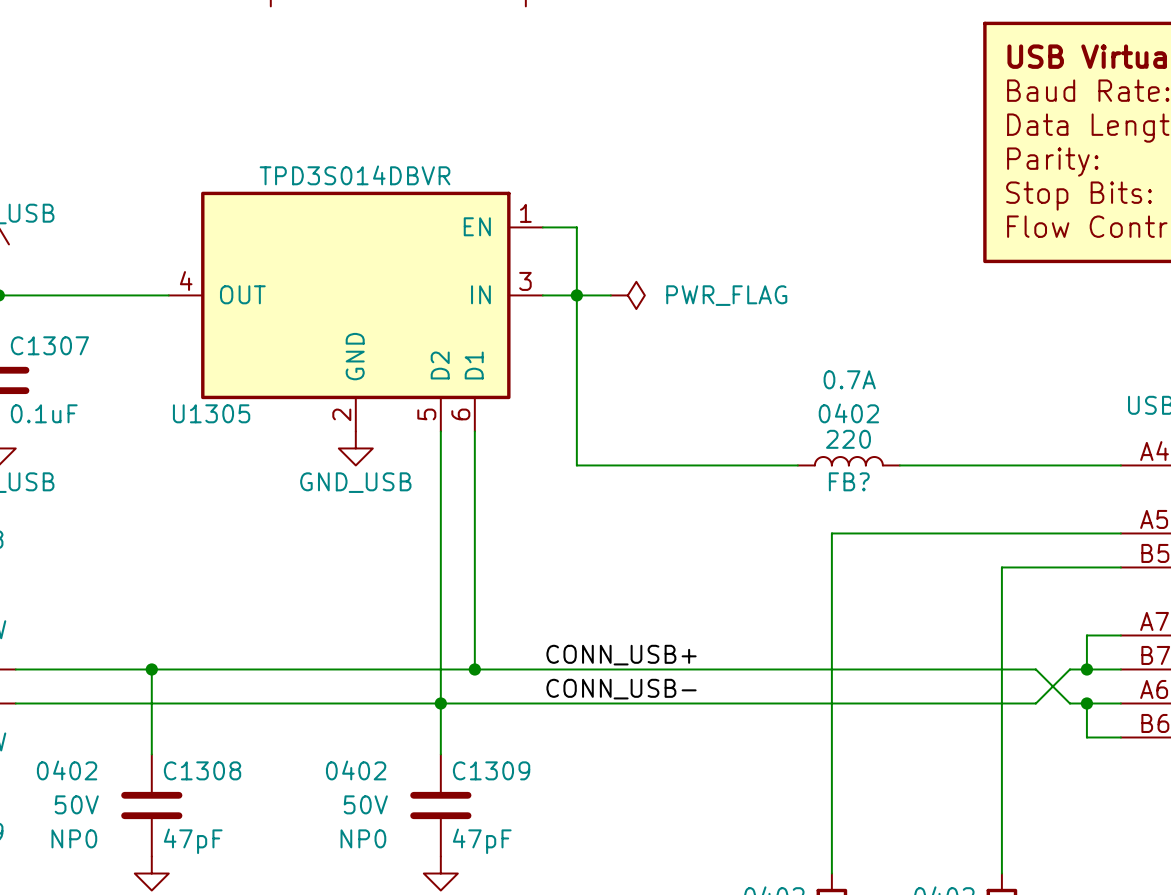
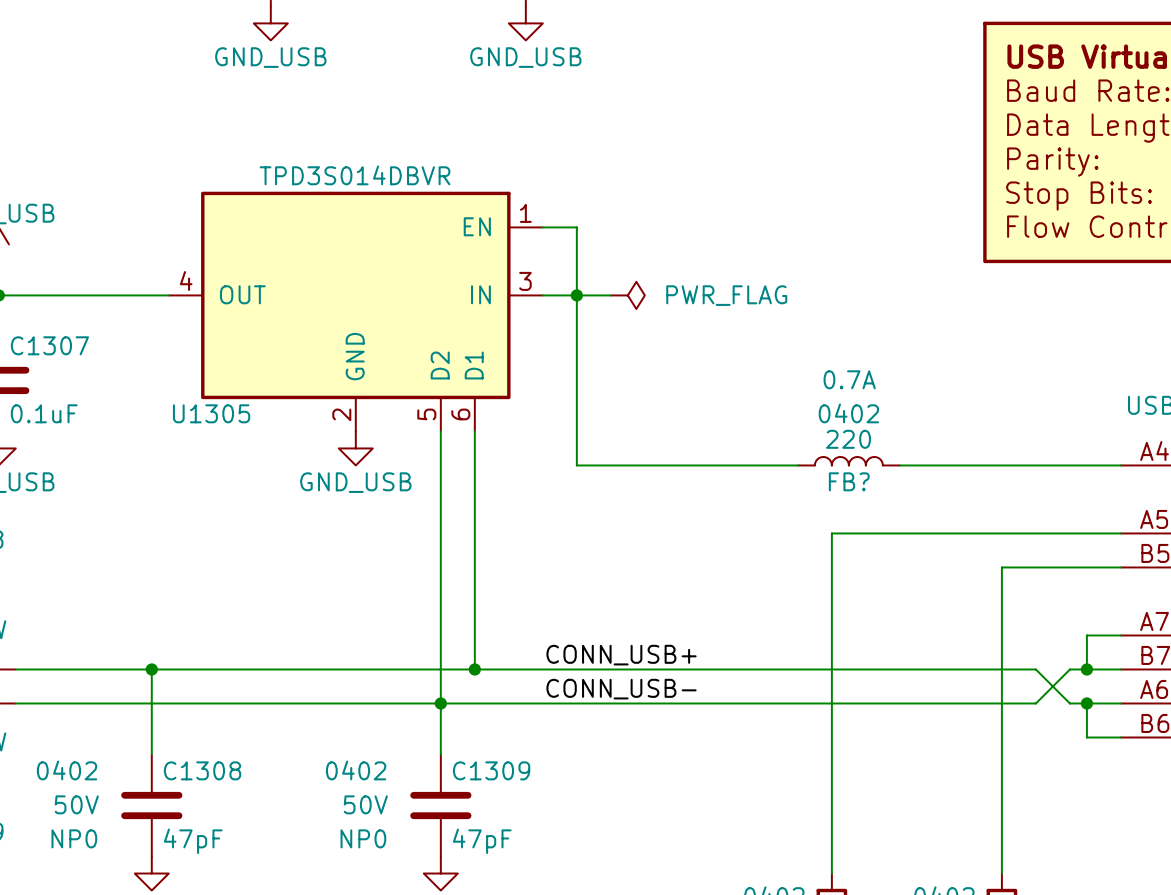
power symbol: none -> GND_USB (270, 23)
power symbol: none -> GND_USB (525, 23)

